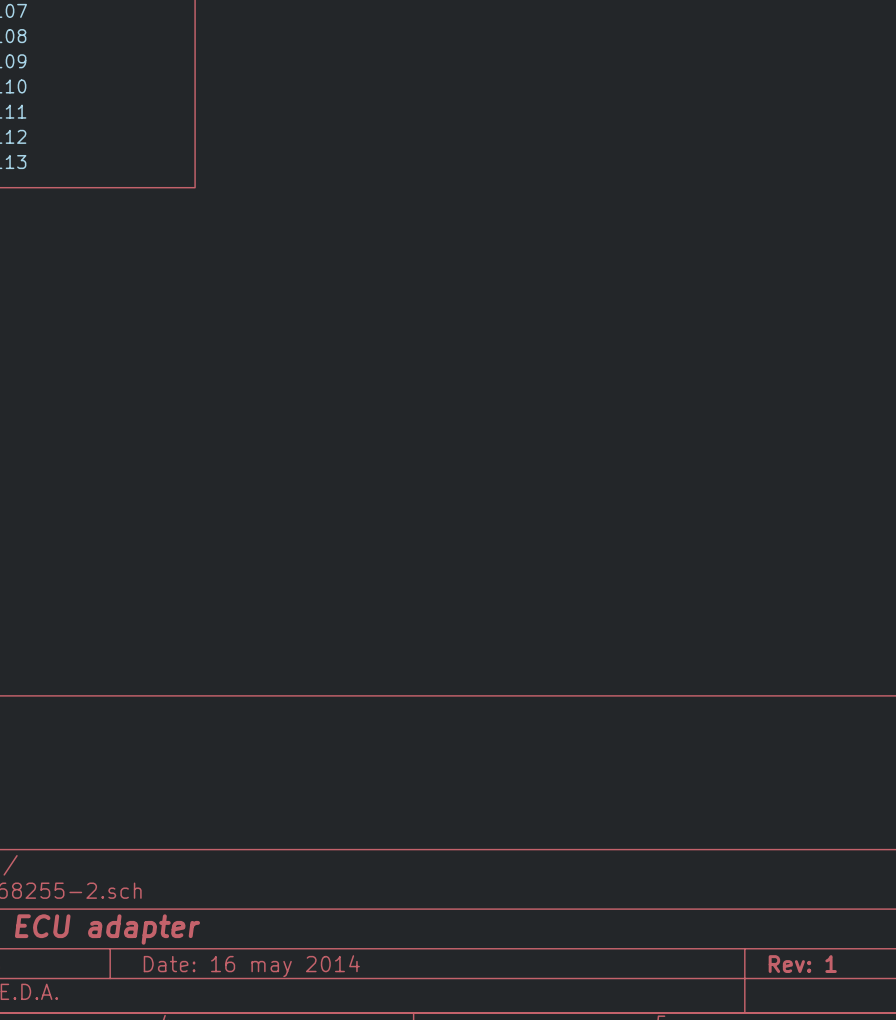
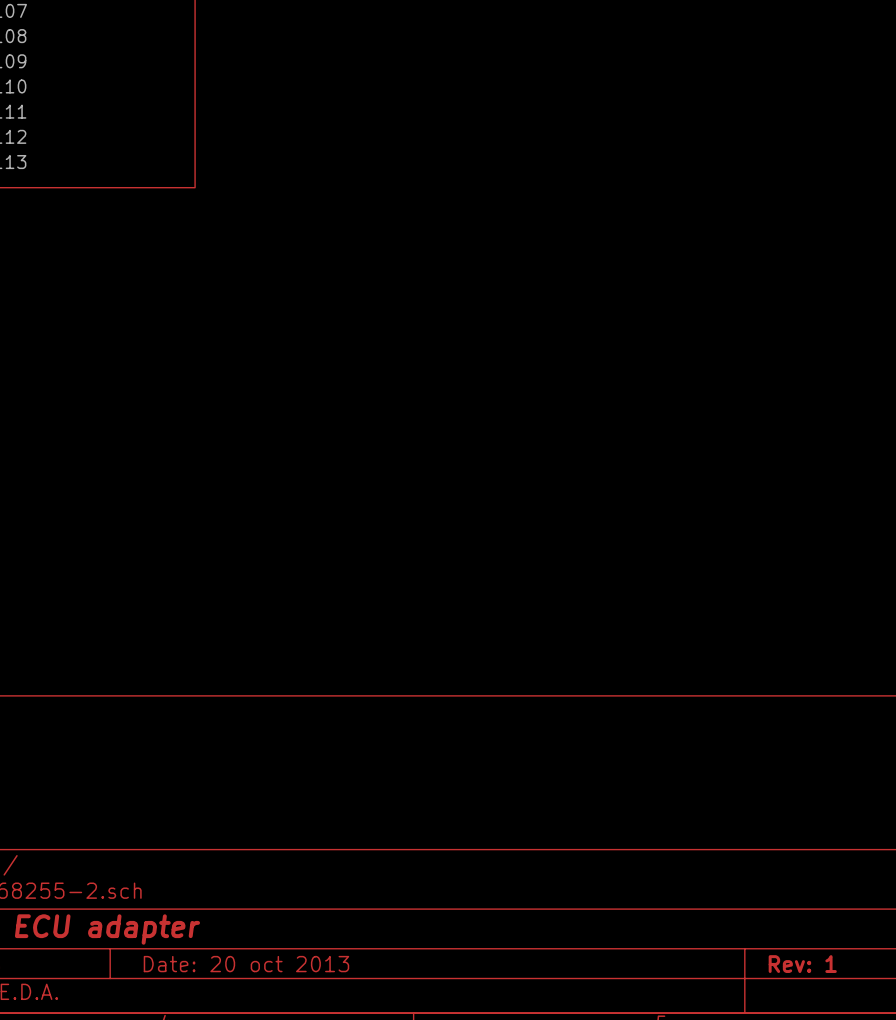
title block: Date: 16 may 2014 (251, 966) -> Date: 20 oct 2013 (246, 964)

